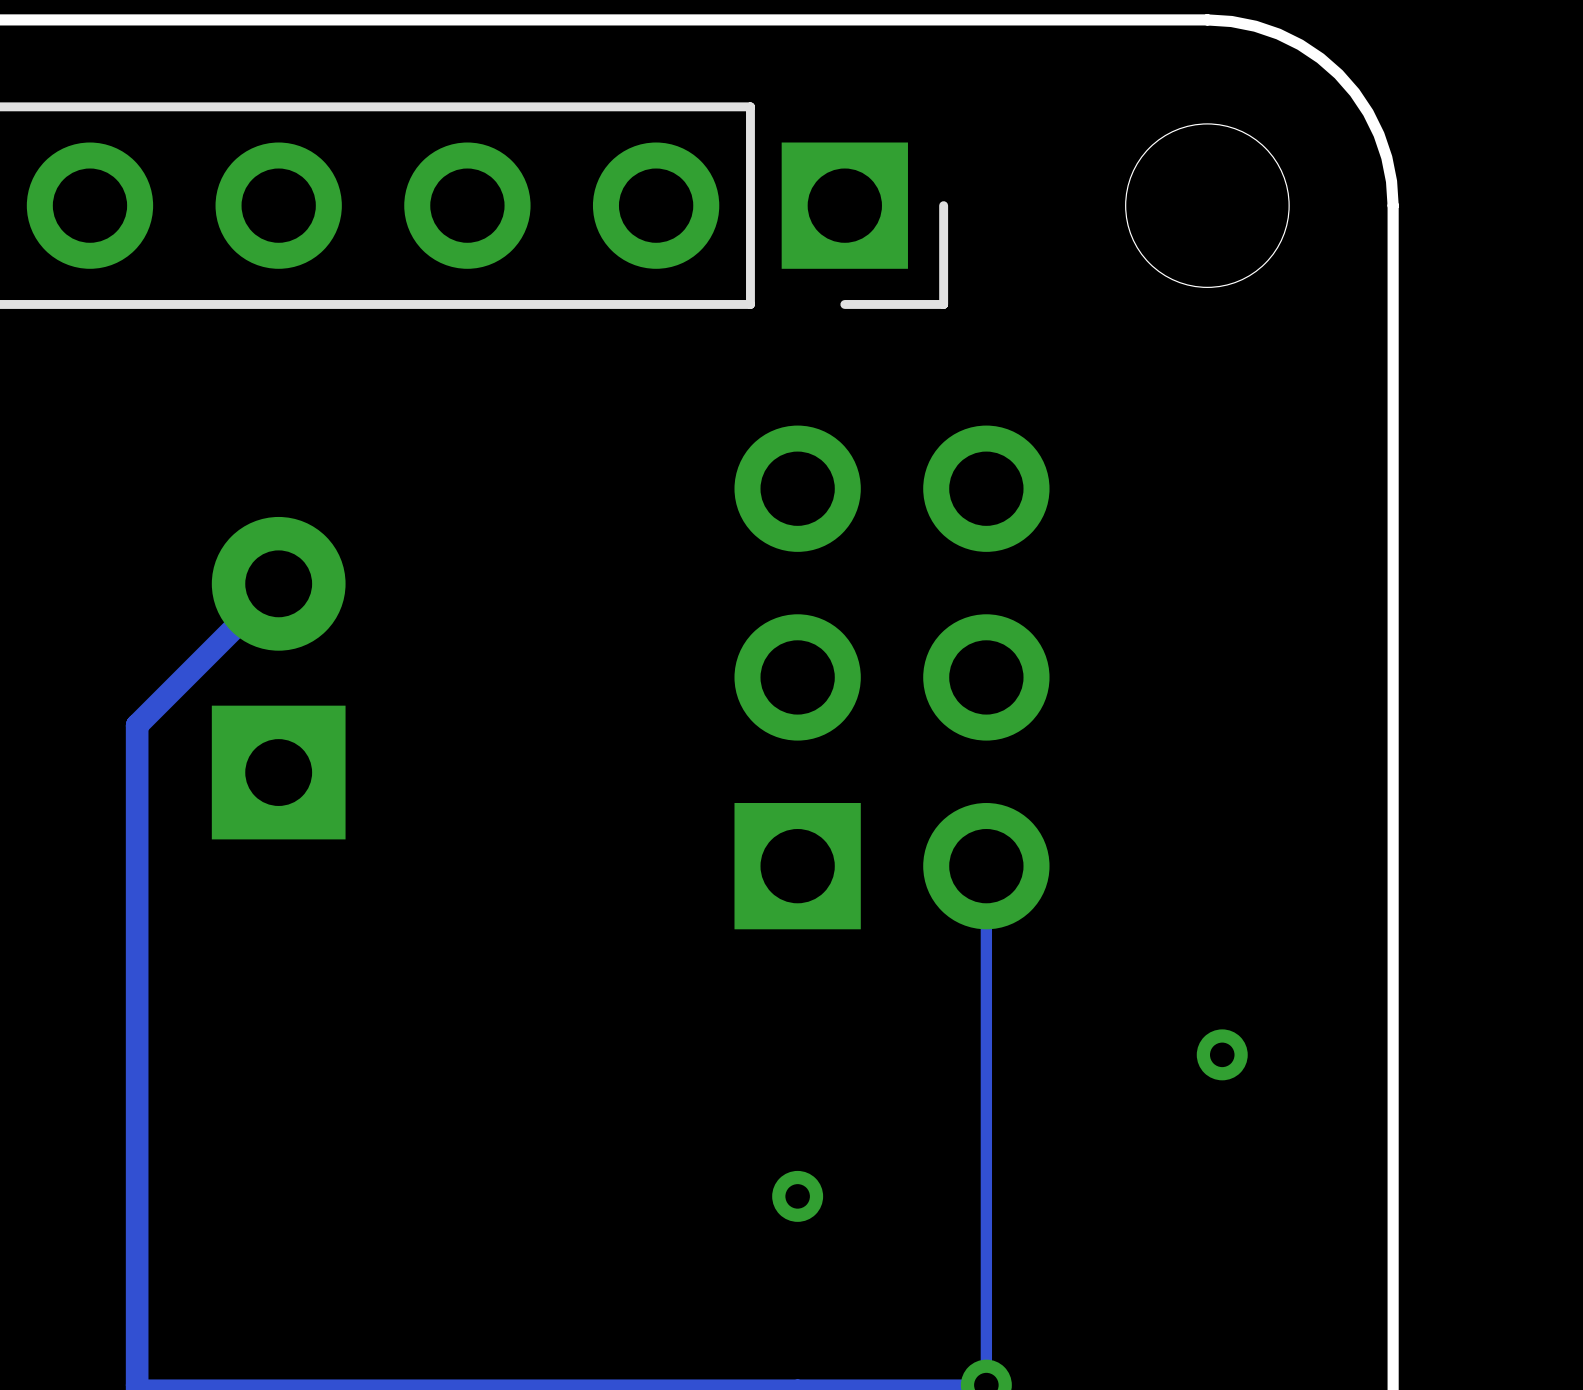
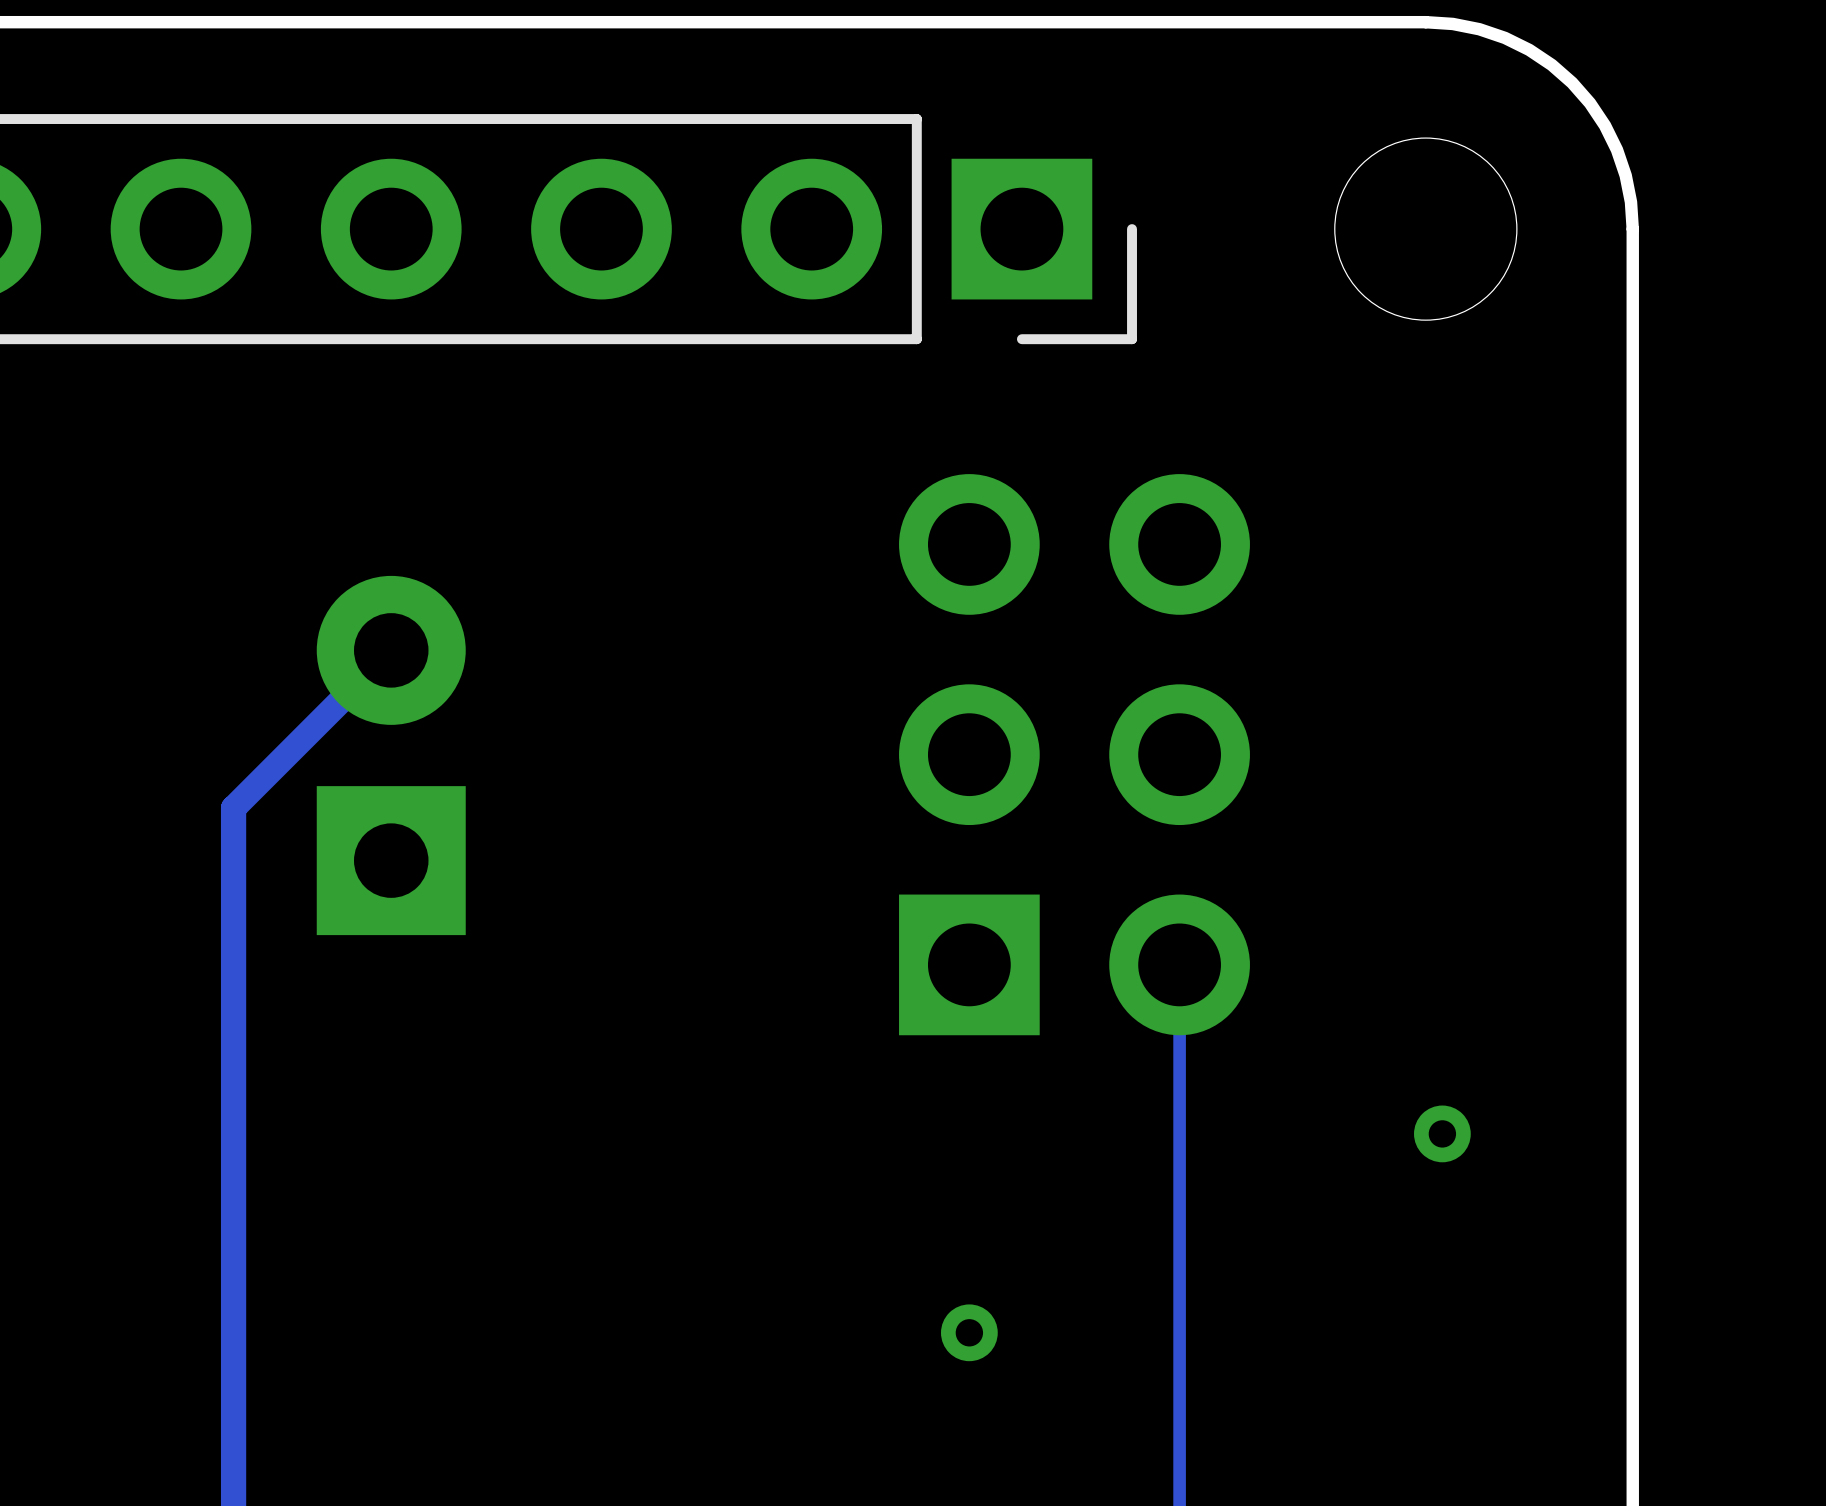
via position: (1222, 1054) -> (1442, 1133)

